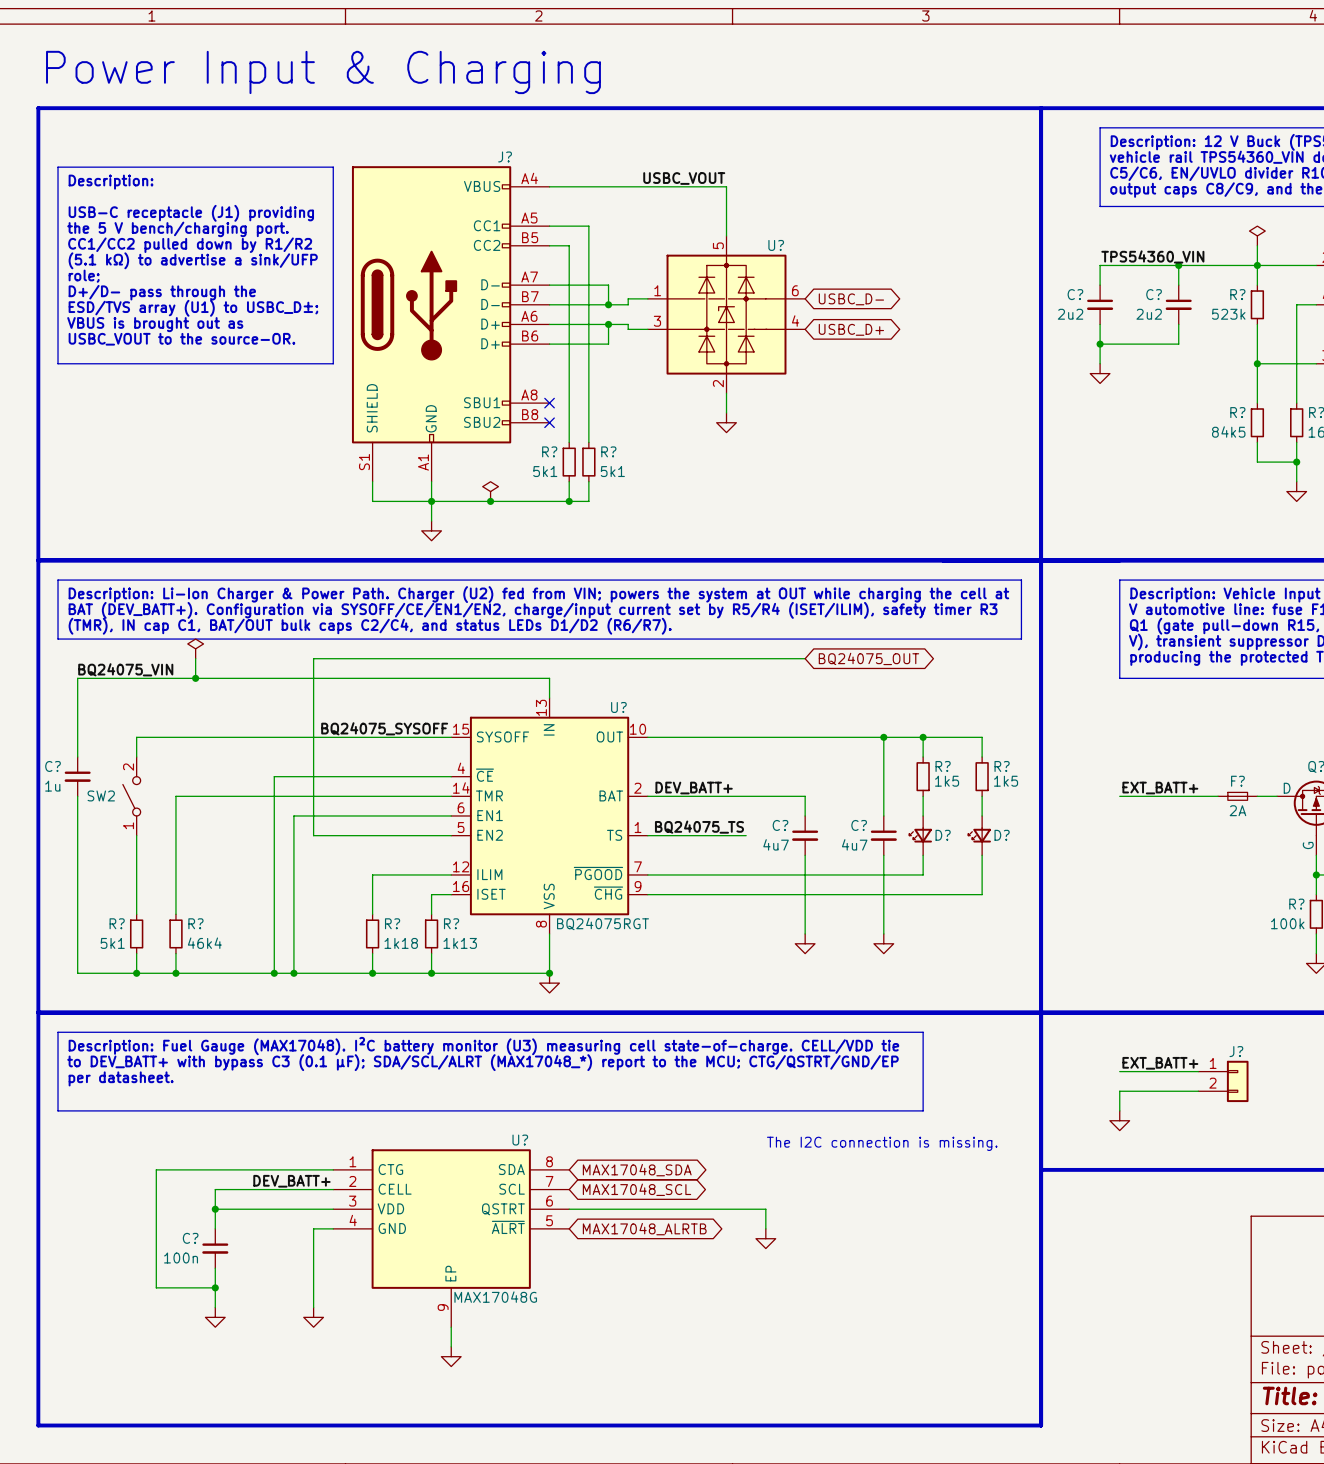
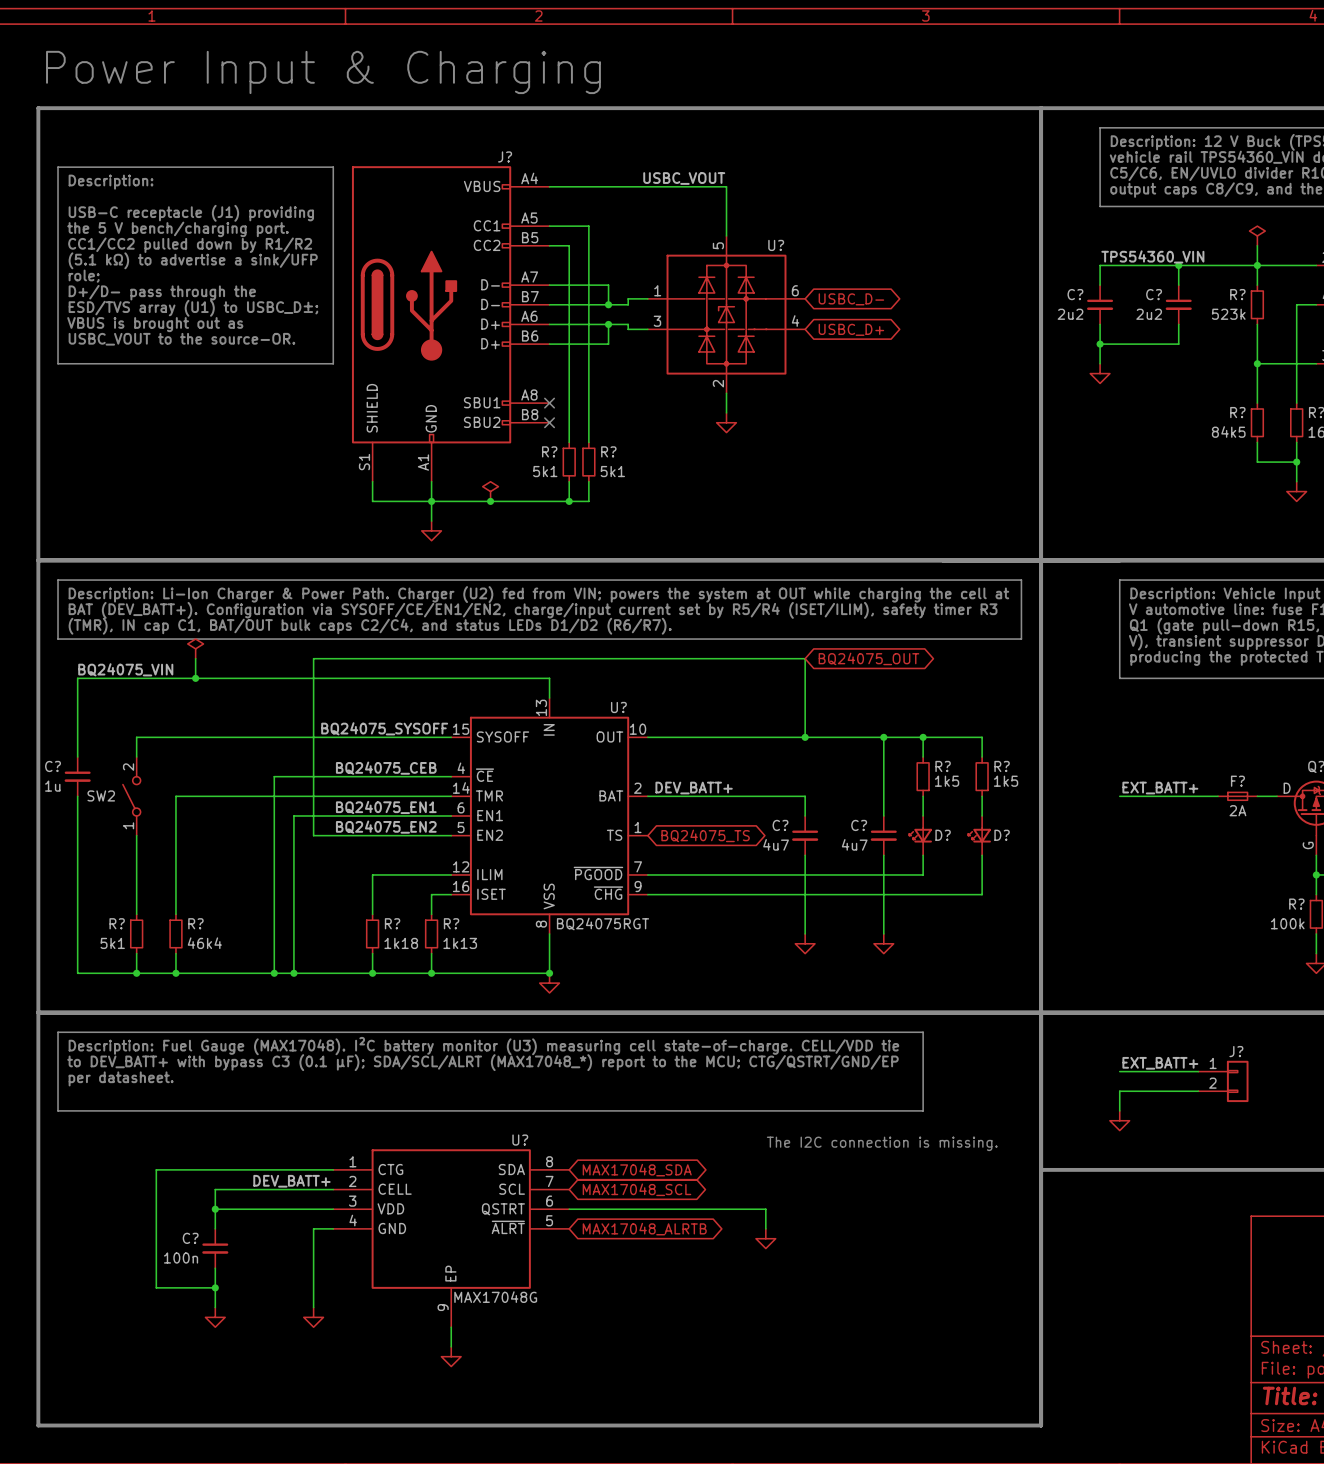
wire: none -> (805, 658) (805, 737)
junction: none -> (805, 737)
label: none -> BQ24075_CEB (386, 768)
label: none -> BQ24075_EN1 (386, 807)
label: none -> BQ24075_EN2 (386, 827)
label: BQ24075_TS (699, 827) -> none
wire: (647, 835) (746, 835) -> none
global label: none -> BQ24075_TS (705, 835)

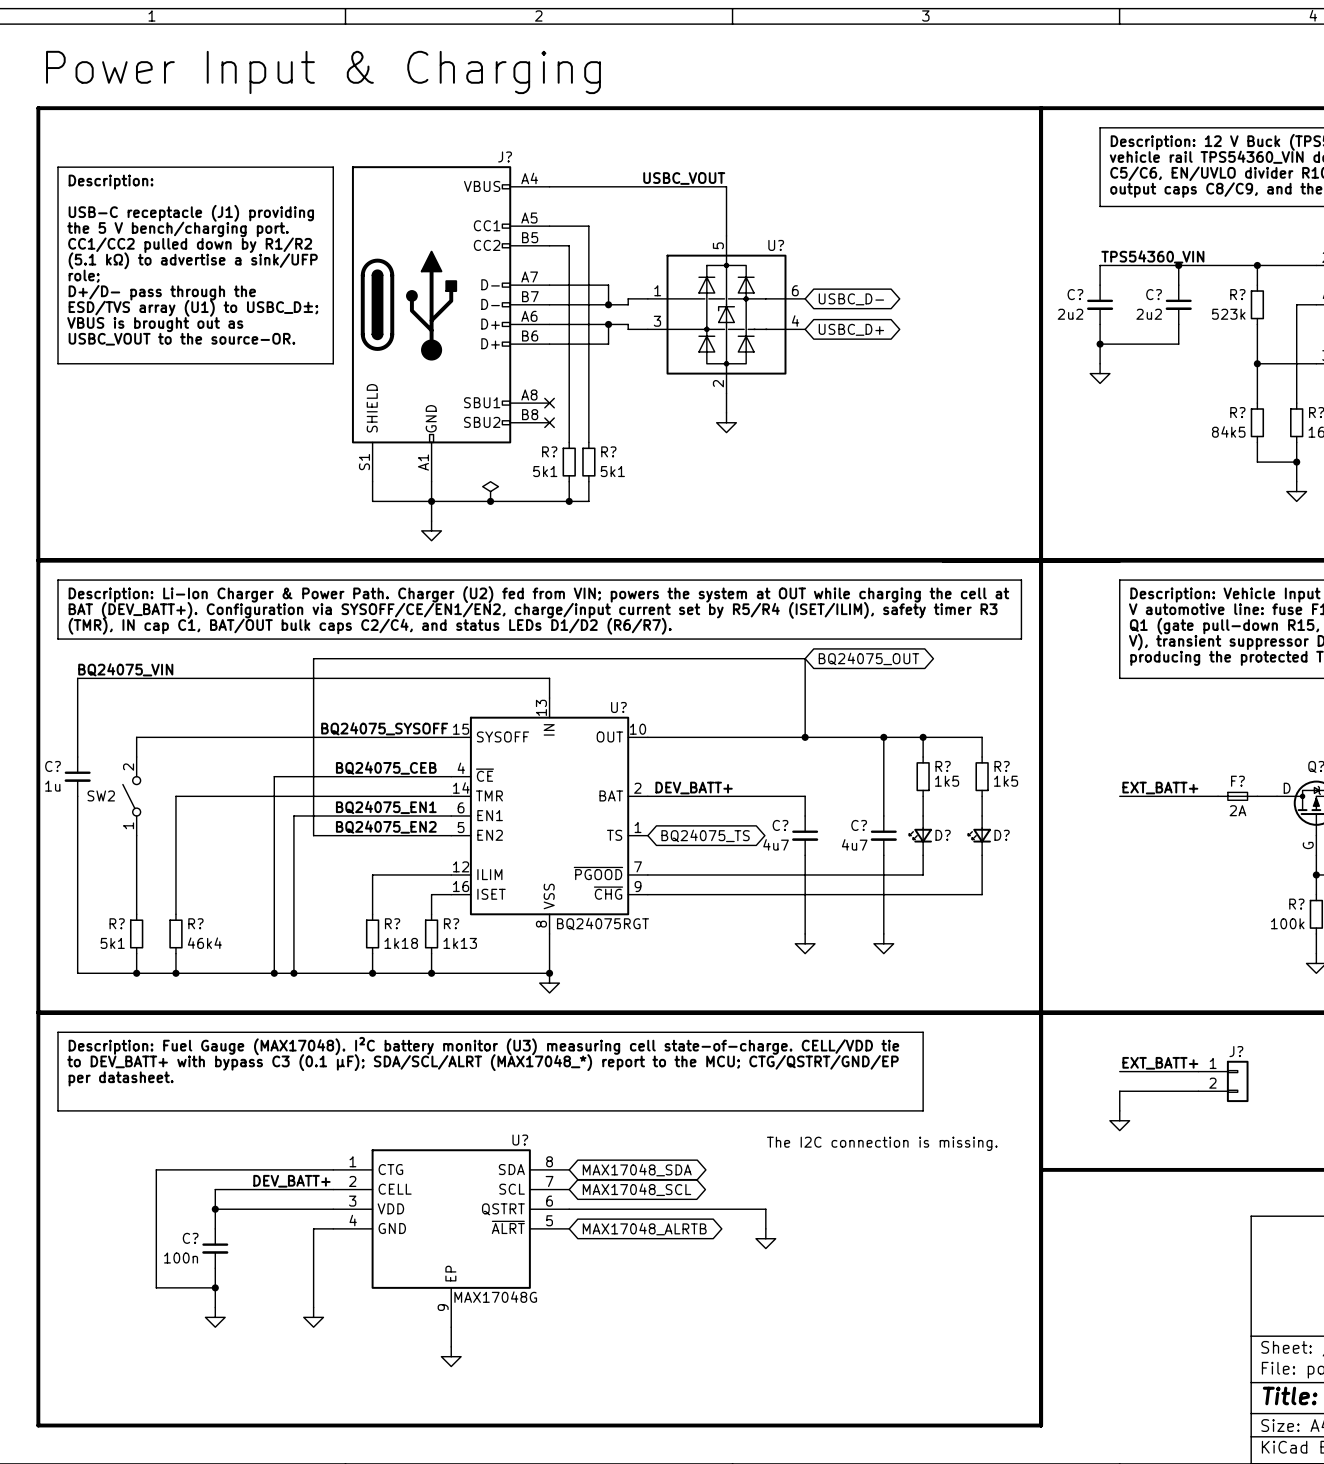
power symbol: (1257, 235) -> none
wire: (1257, 245) (1257, 265) -> none
power symbol: (195, 648) -> none
wire: (195, 658) (195, 678) -> none
junction: (195, 678) -> none

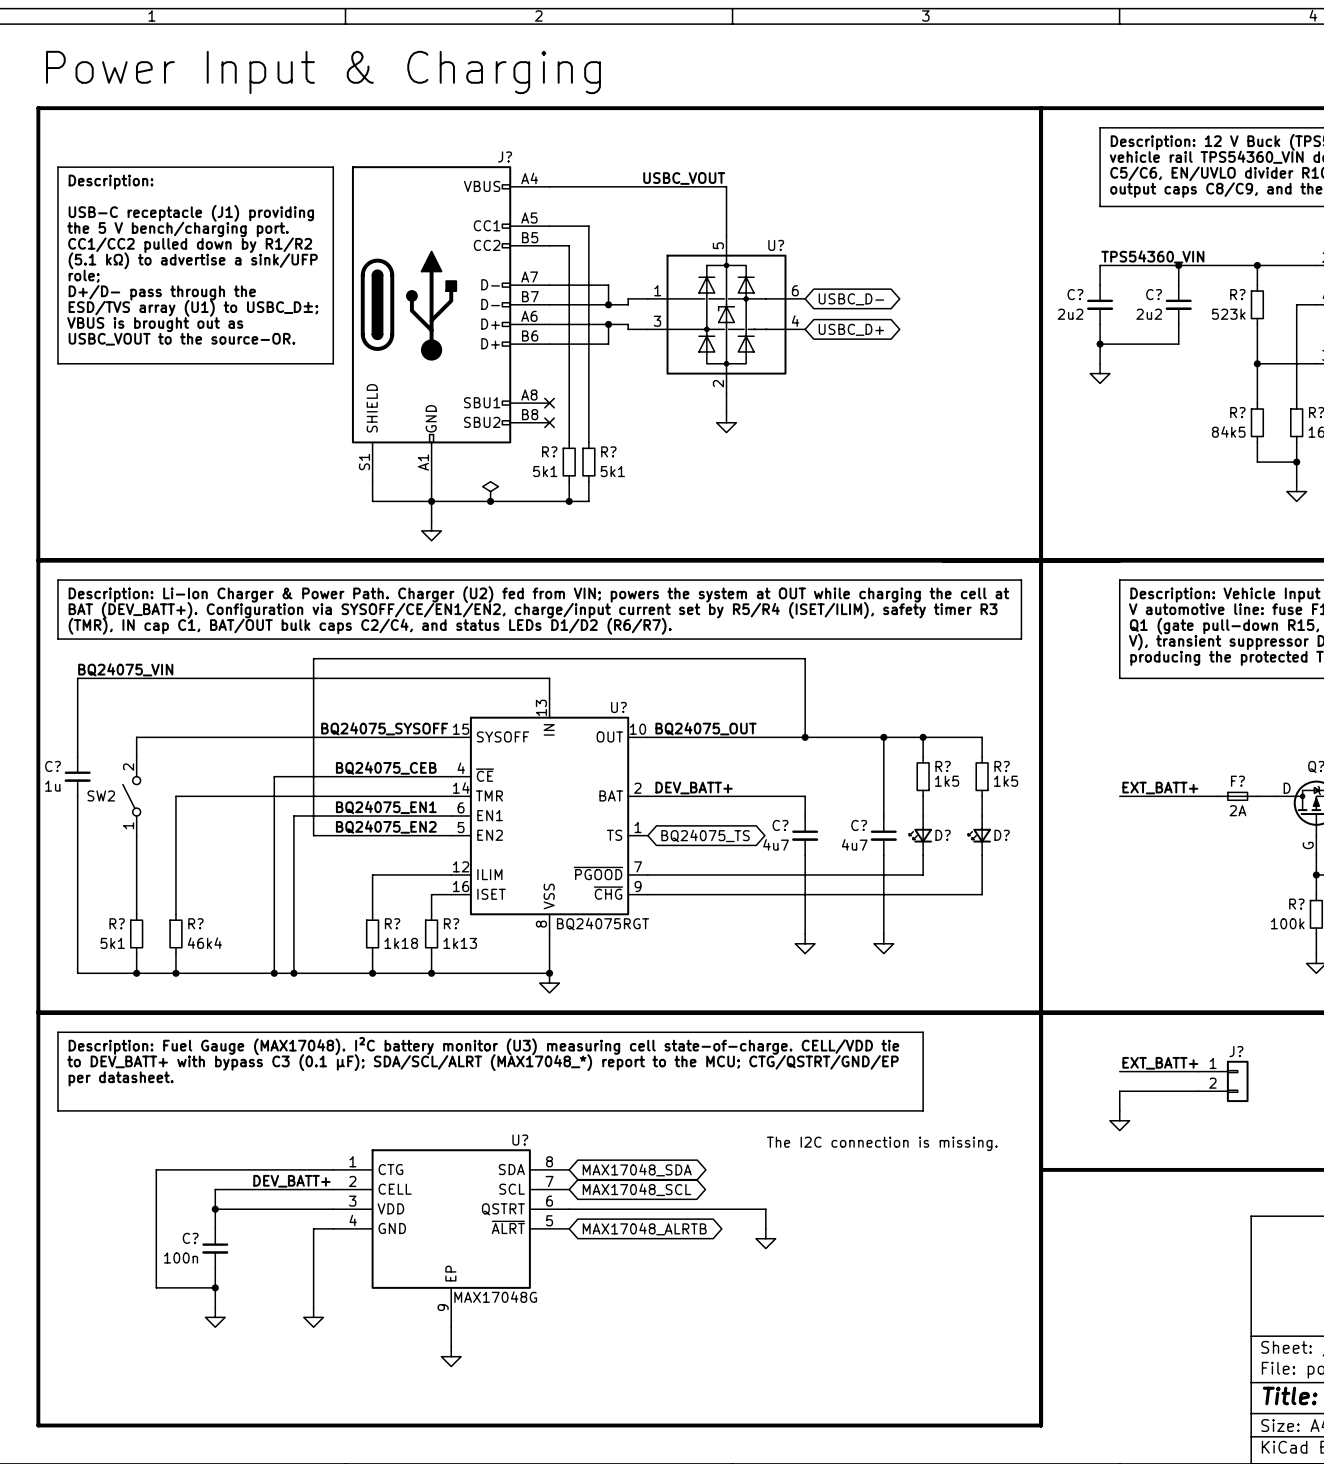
global label: BQ24075_OUT (868, 658) -> none
label: none -> BQ24075_OUT (706, 728)

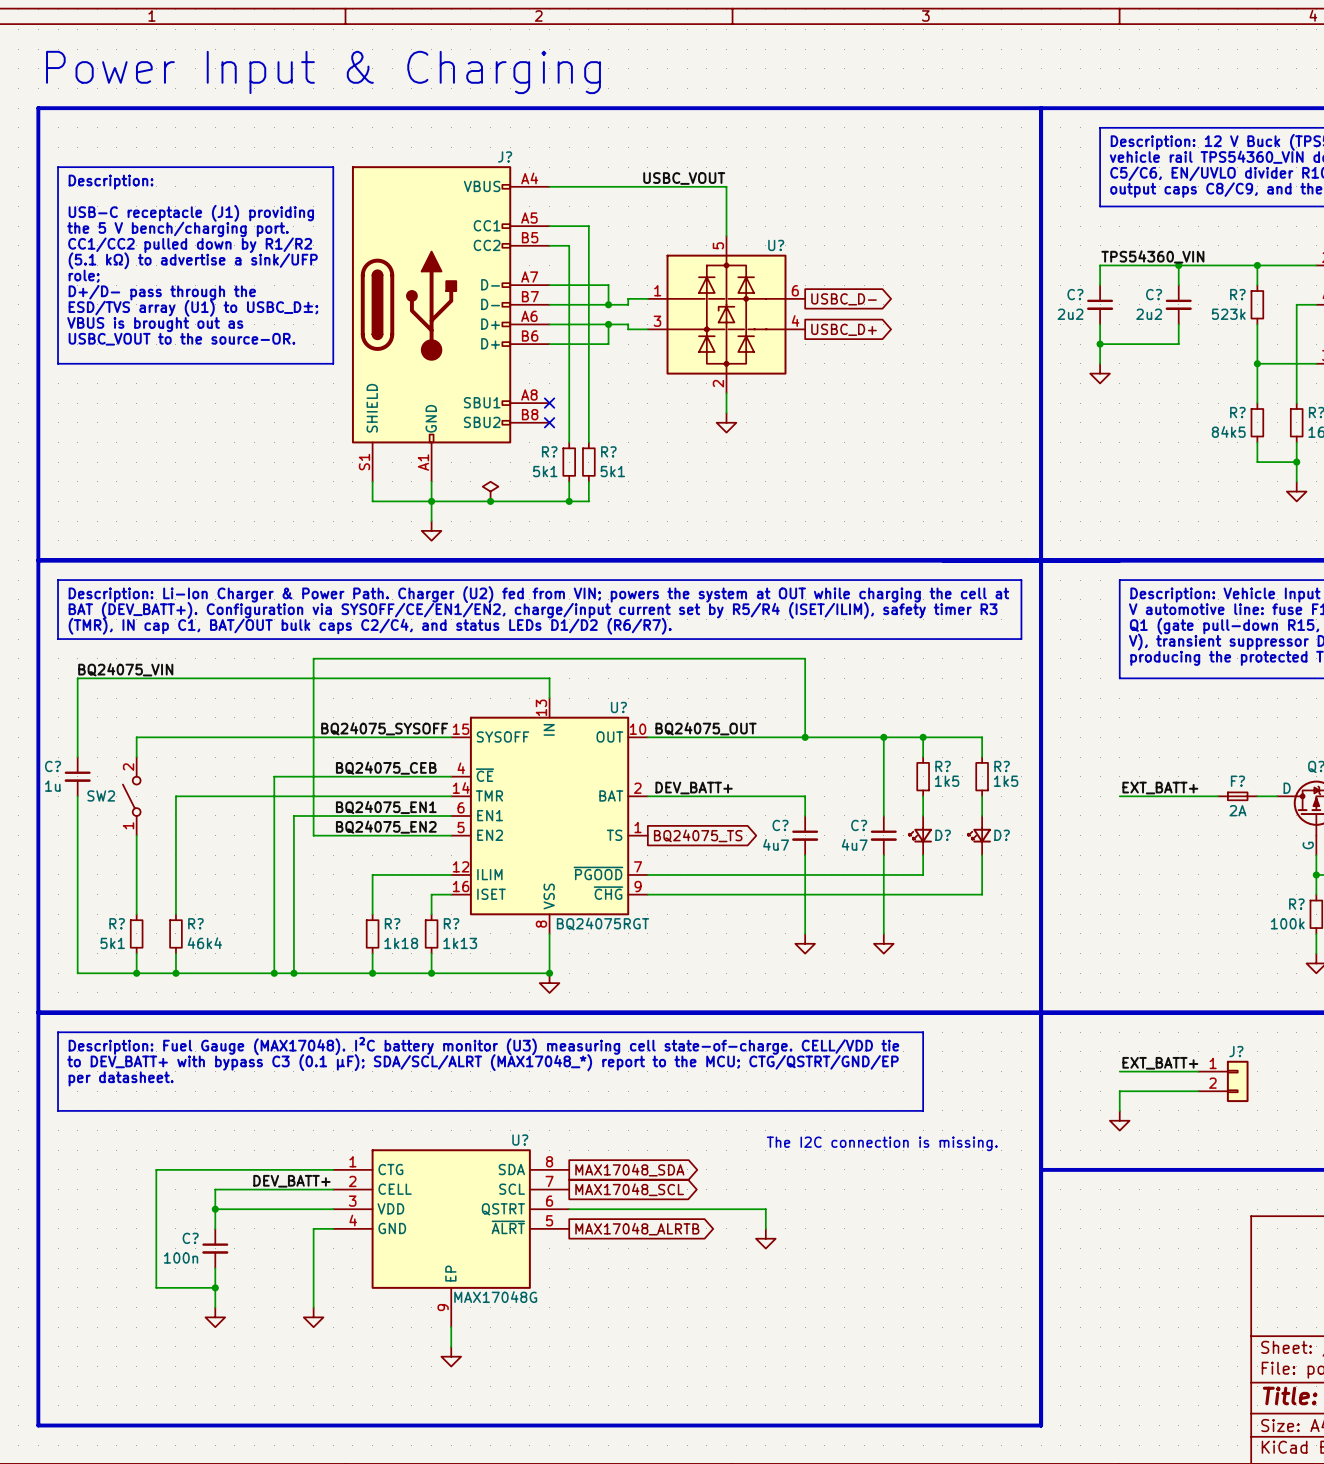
global label shape: bidirectional (851, 299) -> output (844, 299)
global label shape: bidirectional (851, 329) -> output (844, 329)
global label shape: bidirectional (705, 835) -> output (698, 835)
global label shape: bidirectional (637, 1170) -> output (629, 1170)
global label shape: bidirectional (636, 1189) -> output (629, 1189)
global label shape: bidirectional (644, 1229) -> output (637, 1229)

